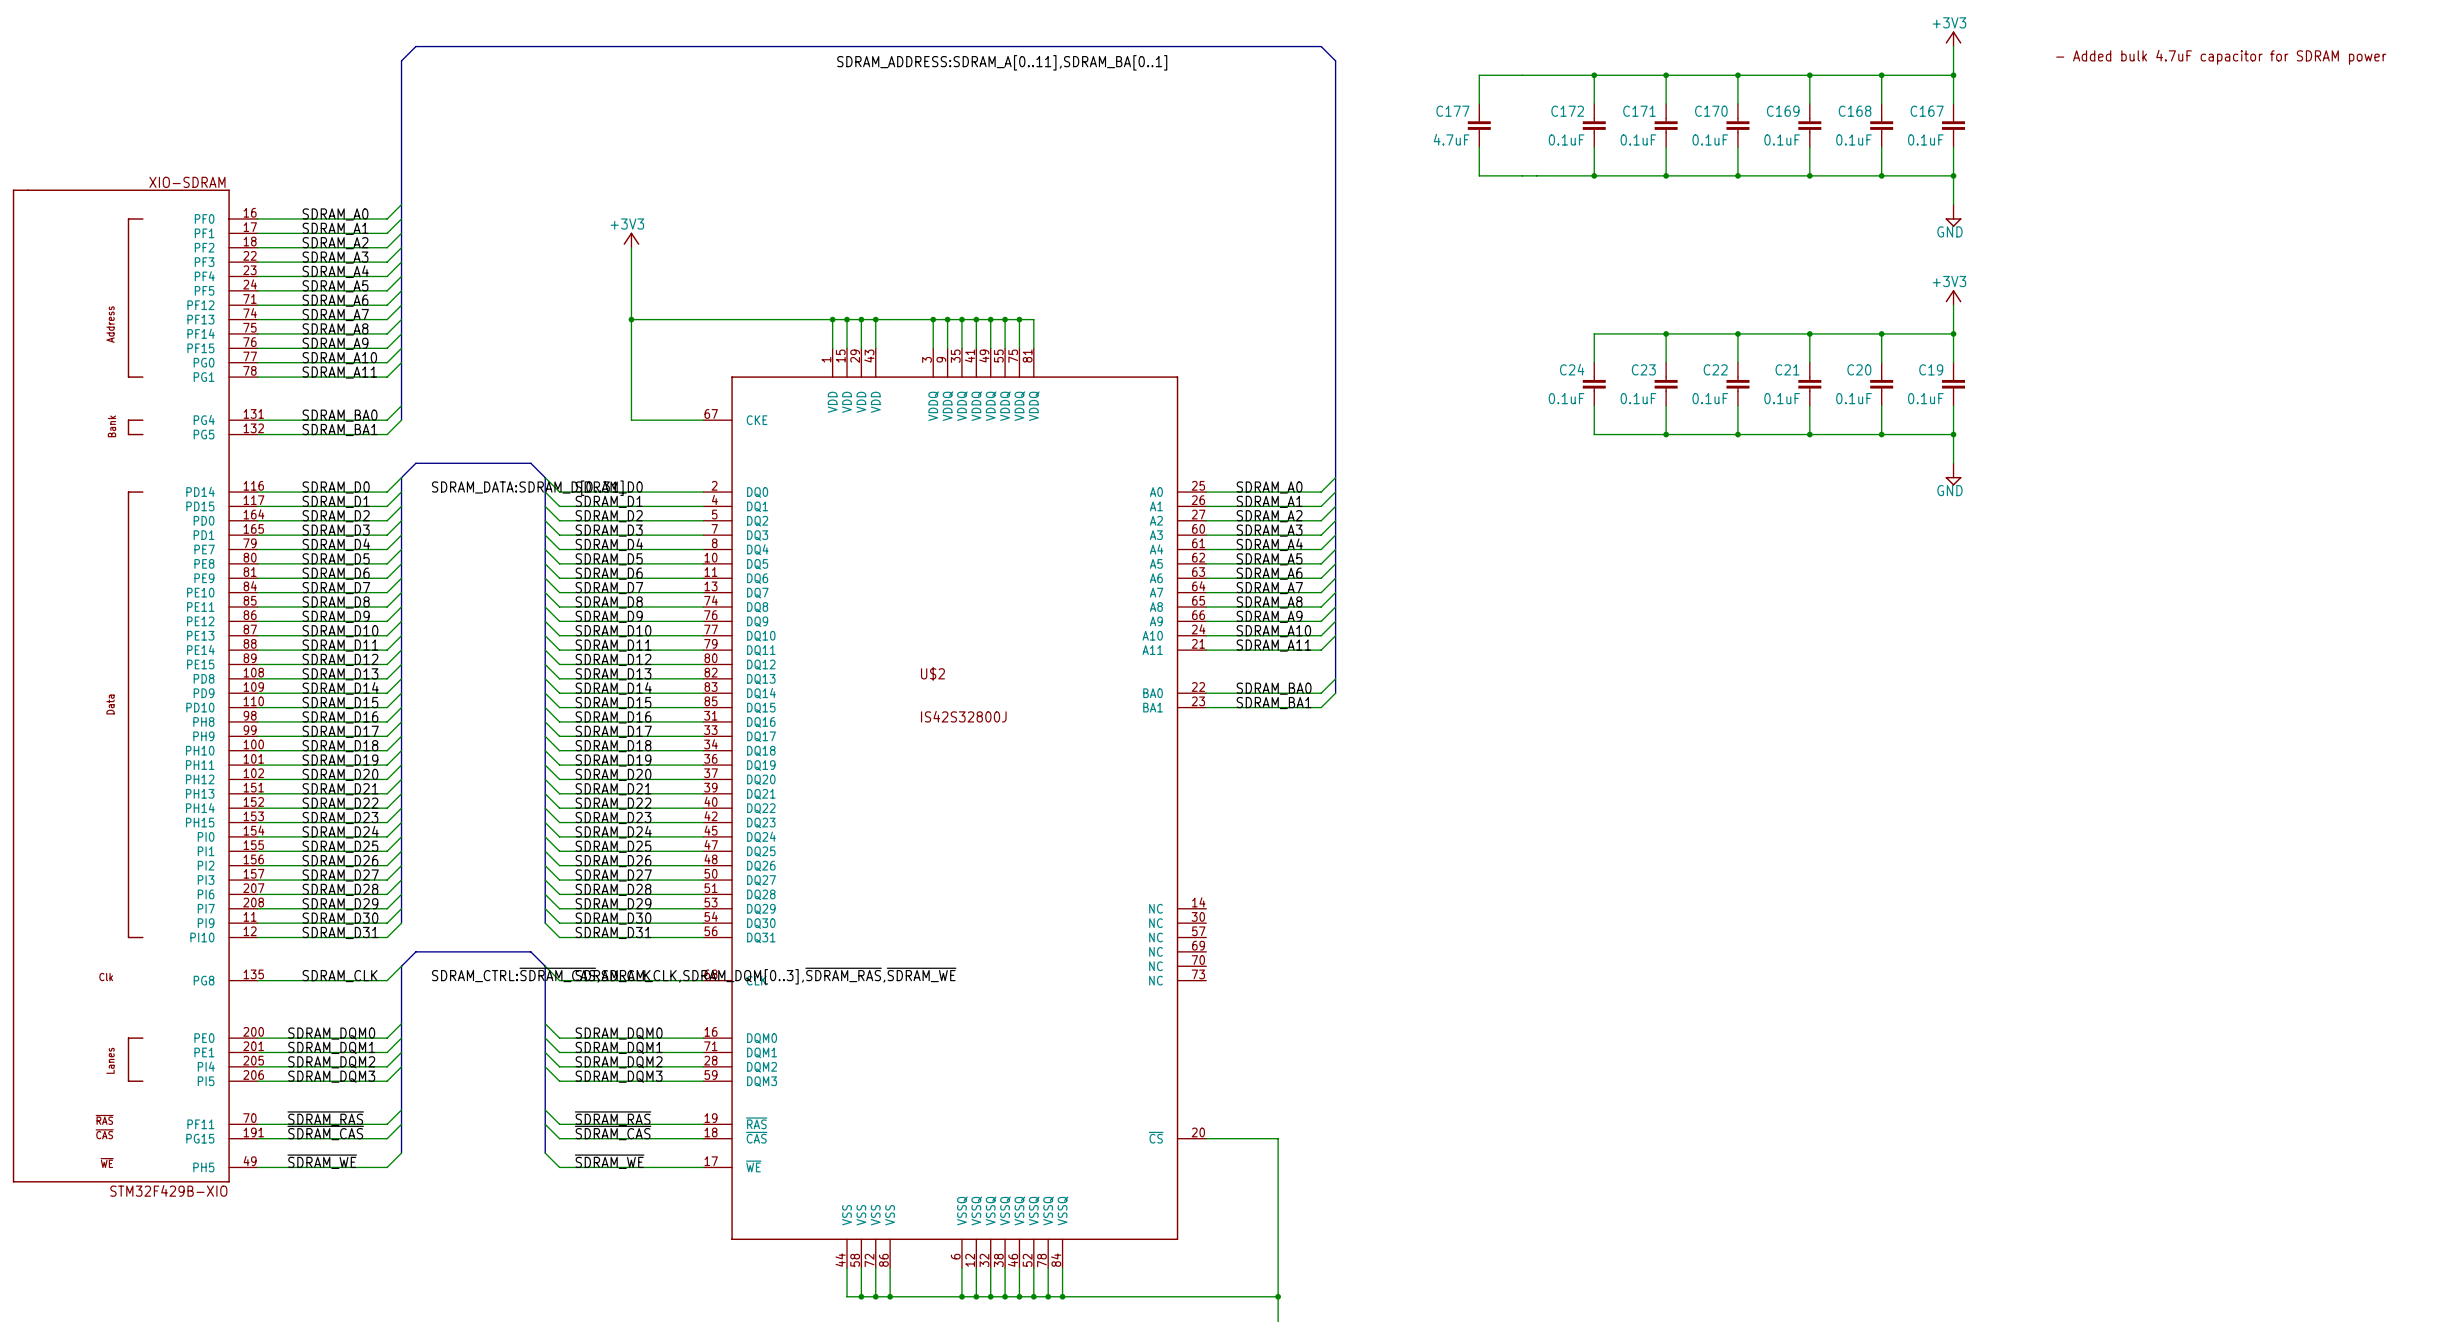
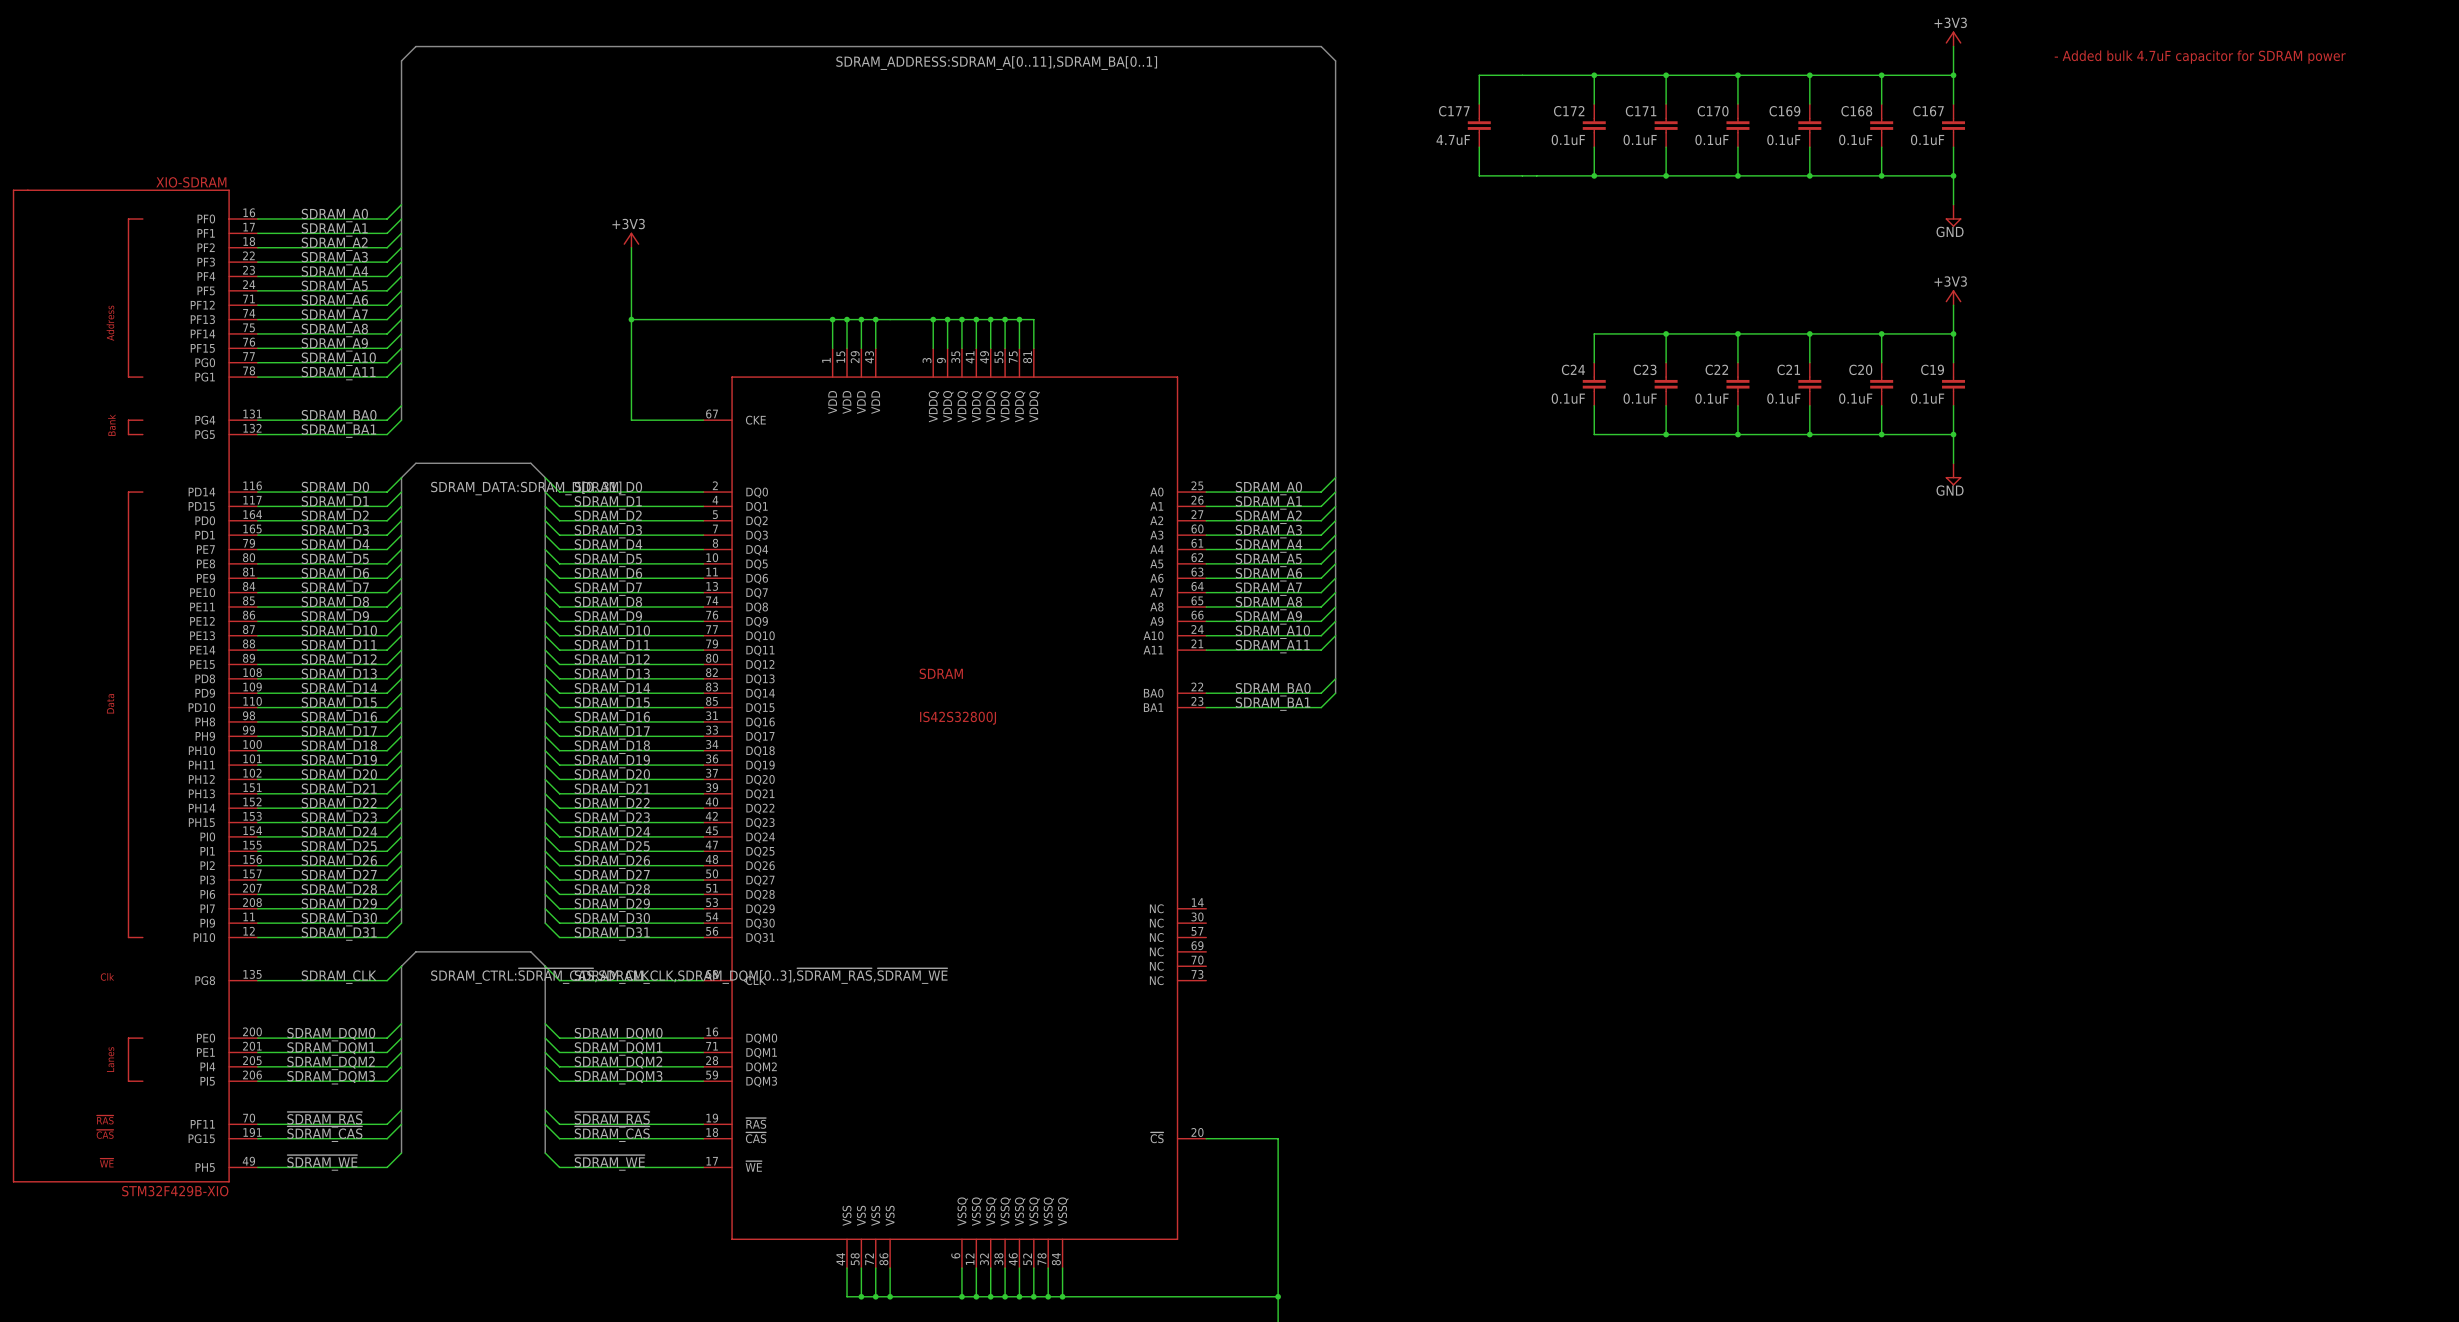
U$2 name: U$2 (932, 673) -> SDRAM (941, 673)

